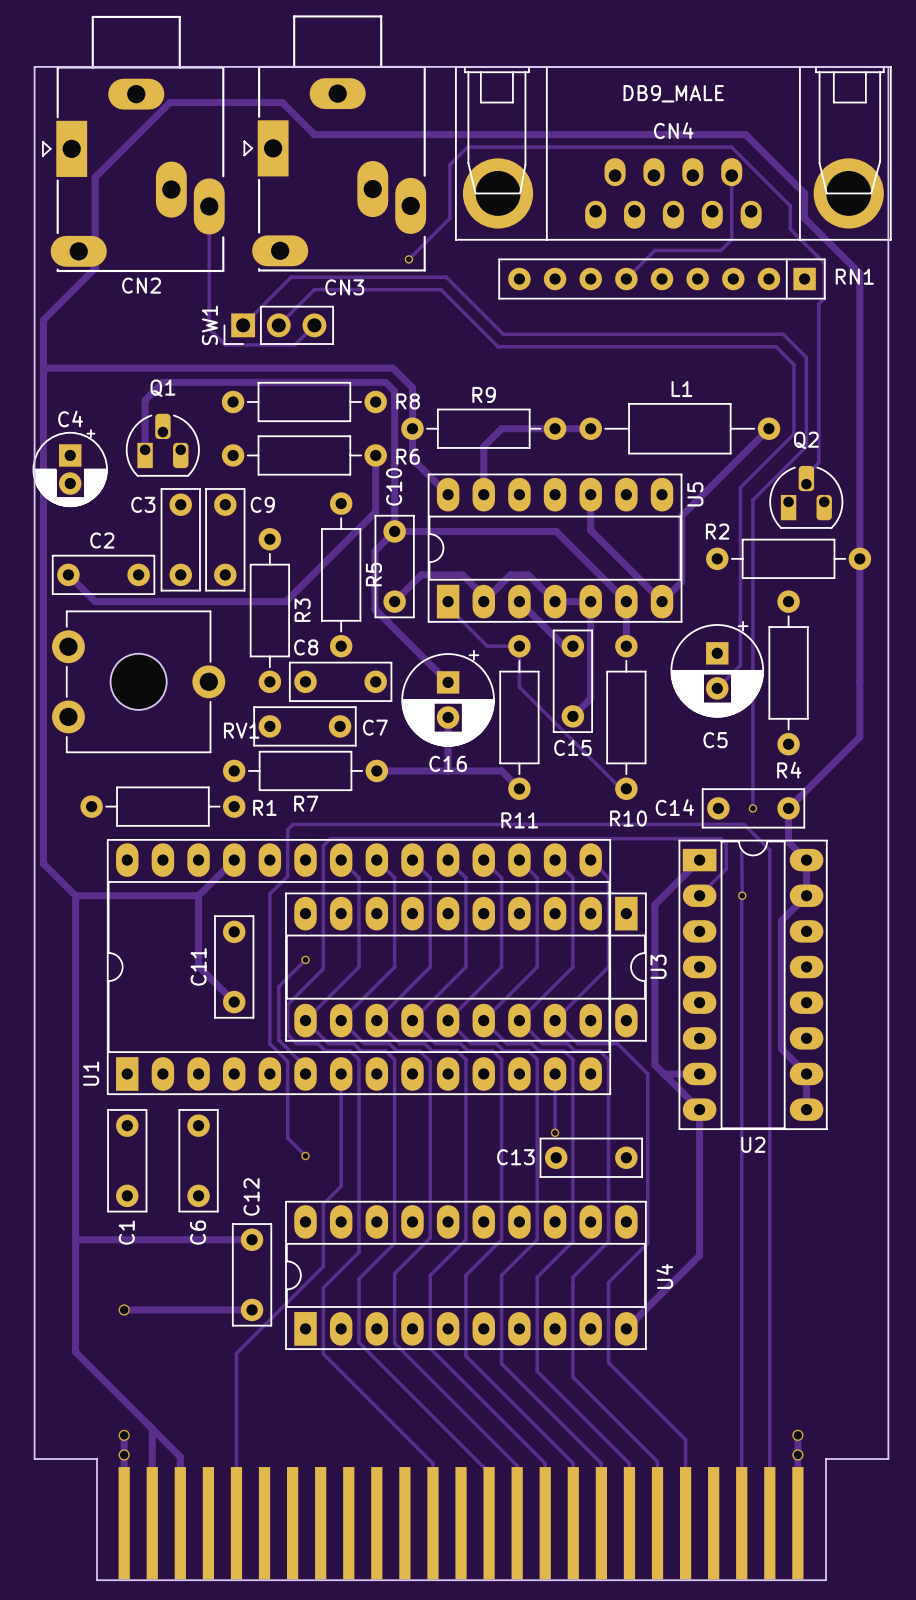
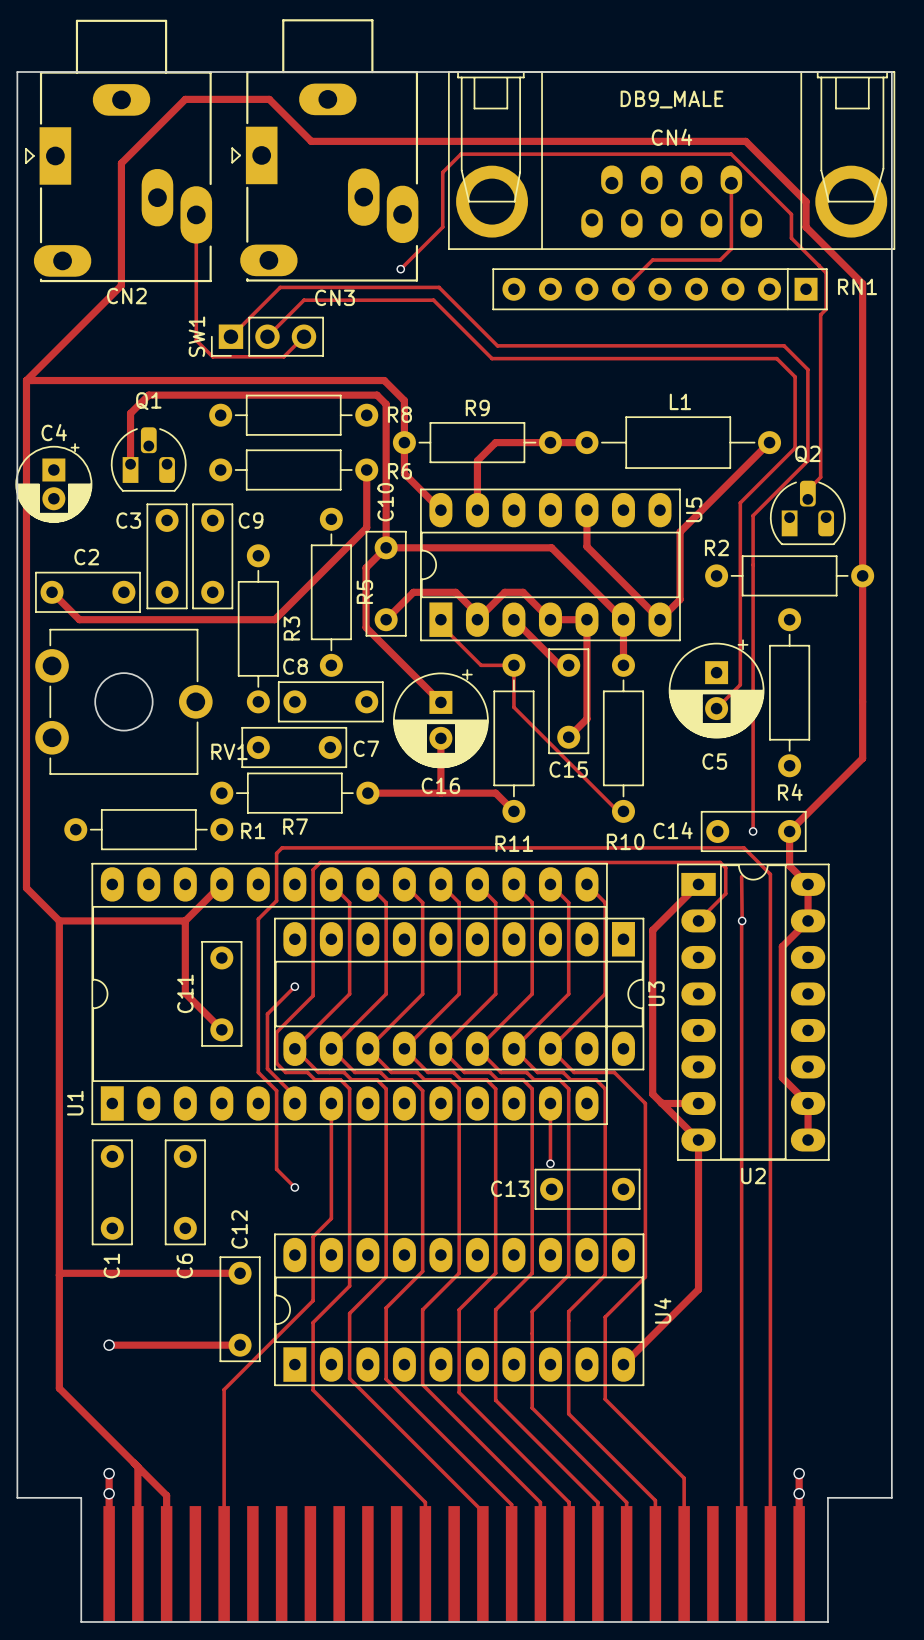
track: (321, 134) (314, 134) (282, 102) (170, 102) (95, 177) (95, 268) (43, 320) (43, 368) -> (311, 141) (269, 99) (185, 99) (121, 163) (121, 285) (26, 380)

